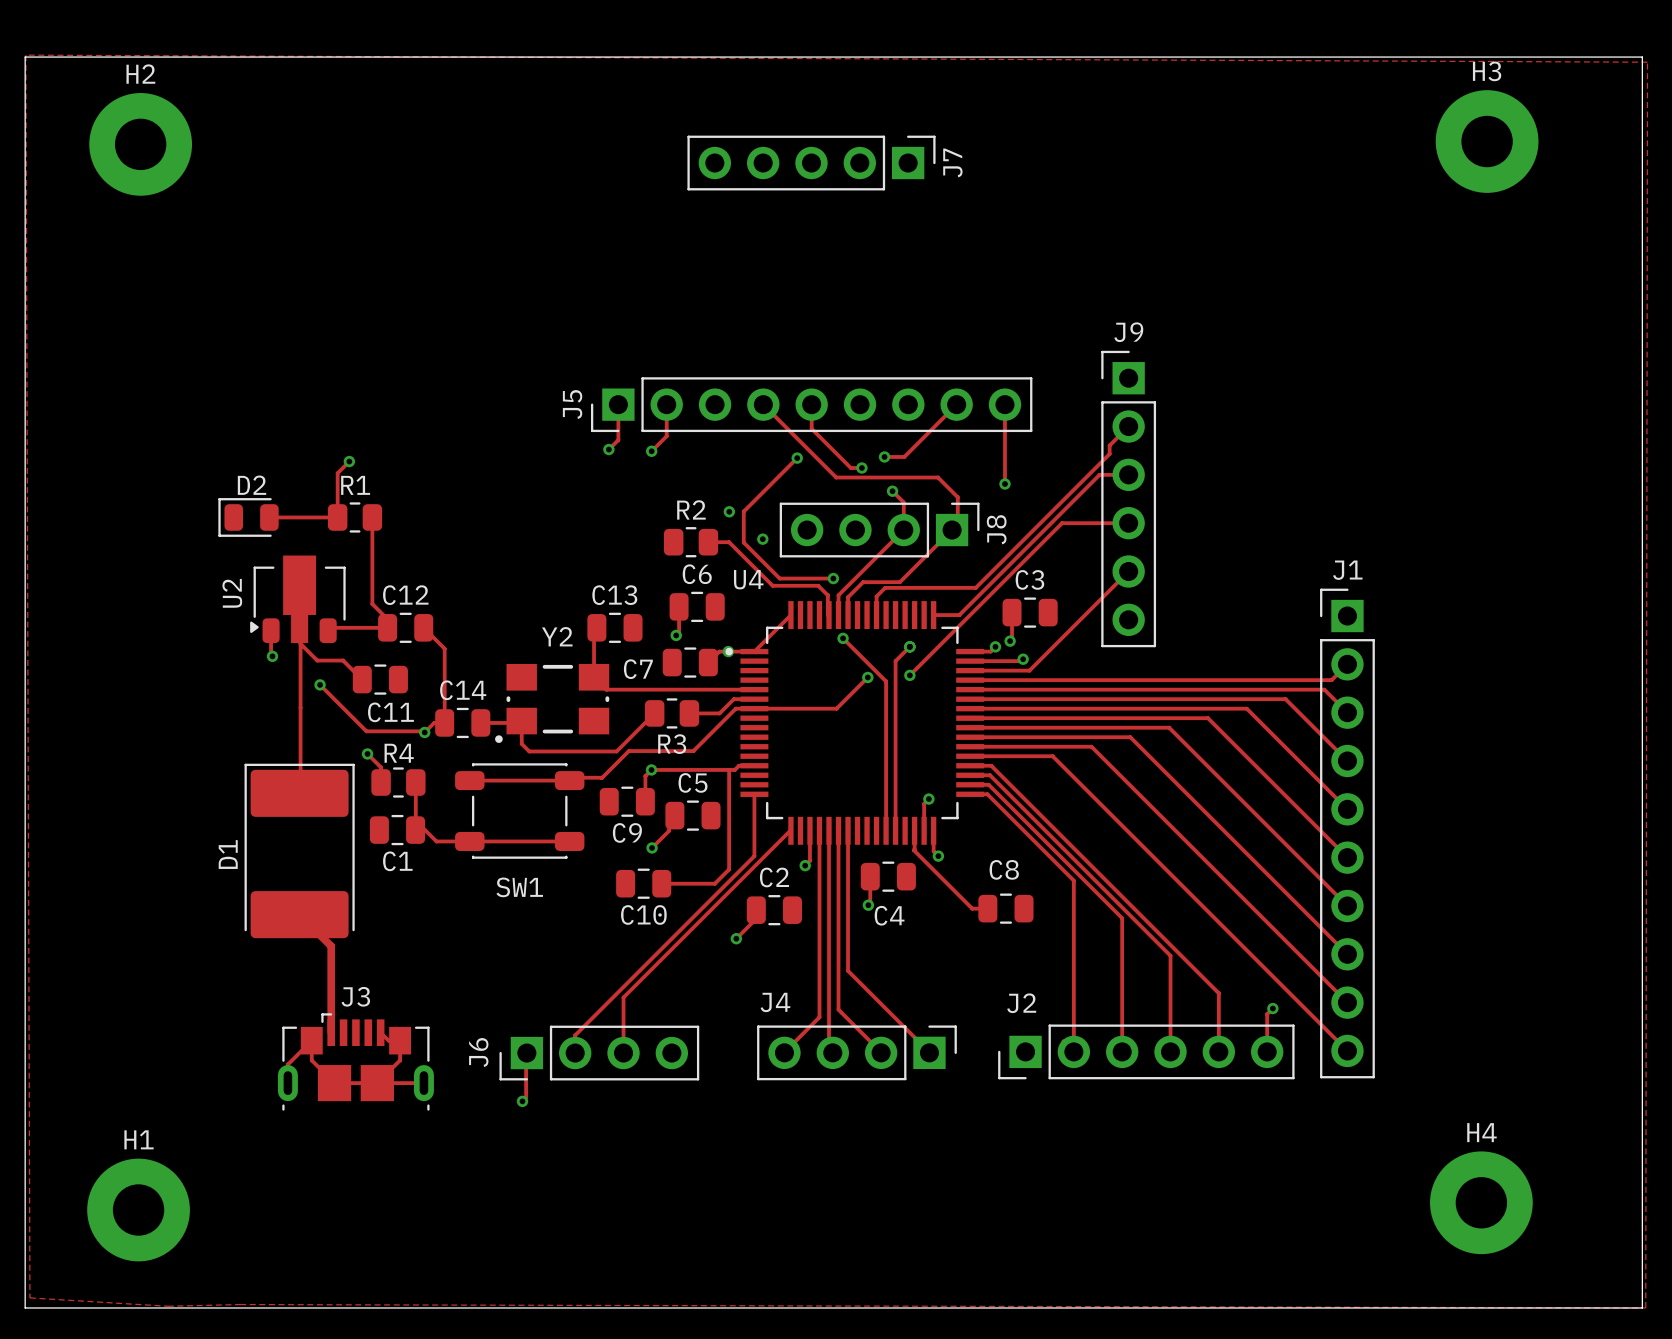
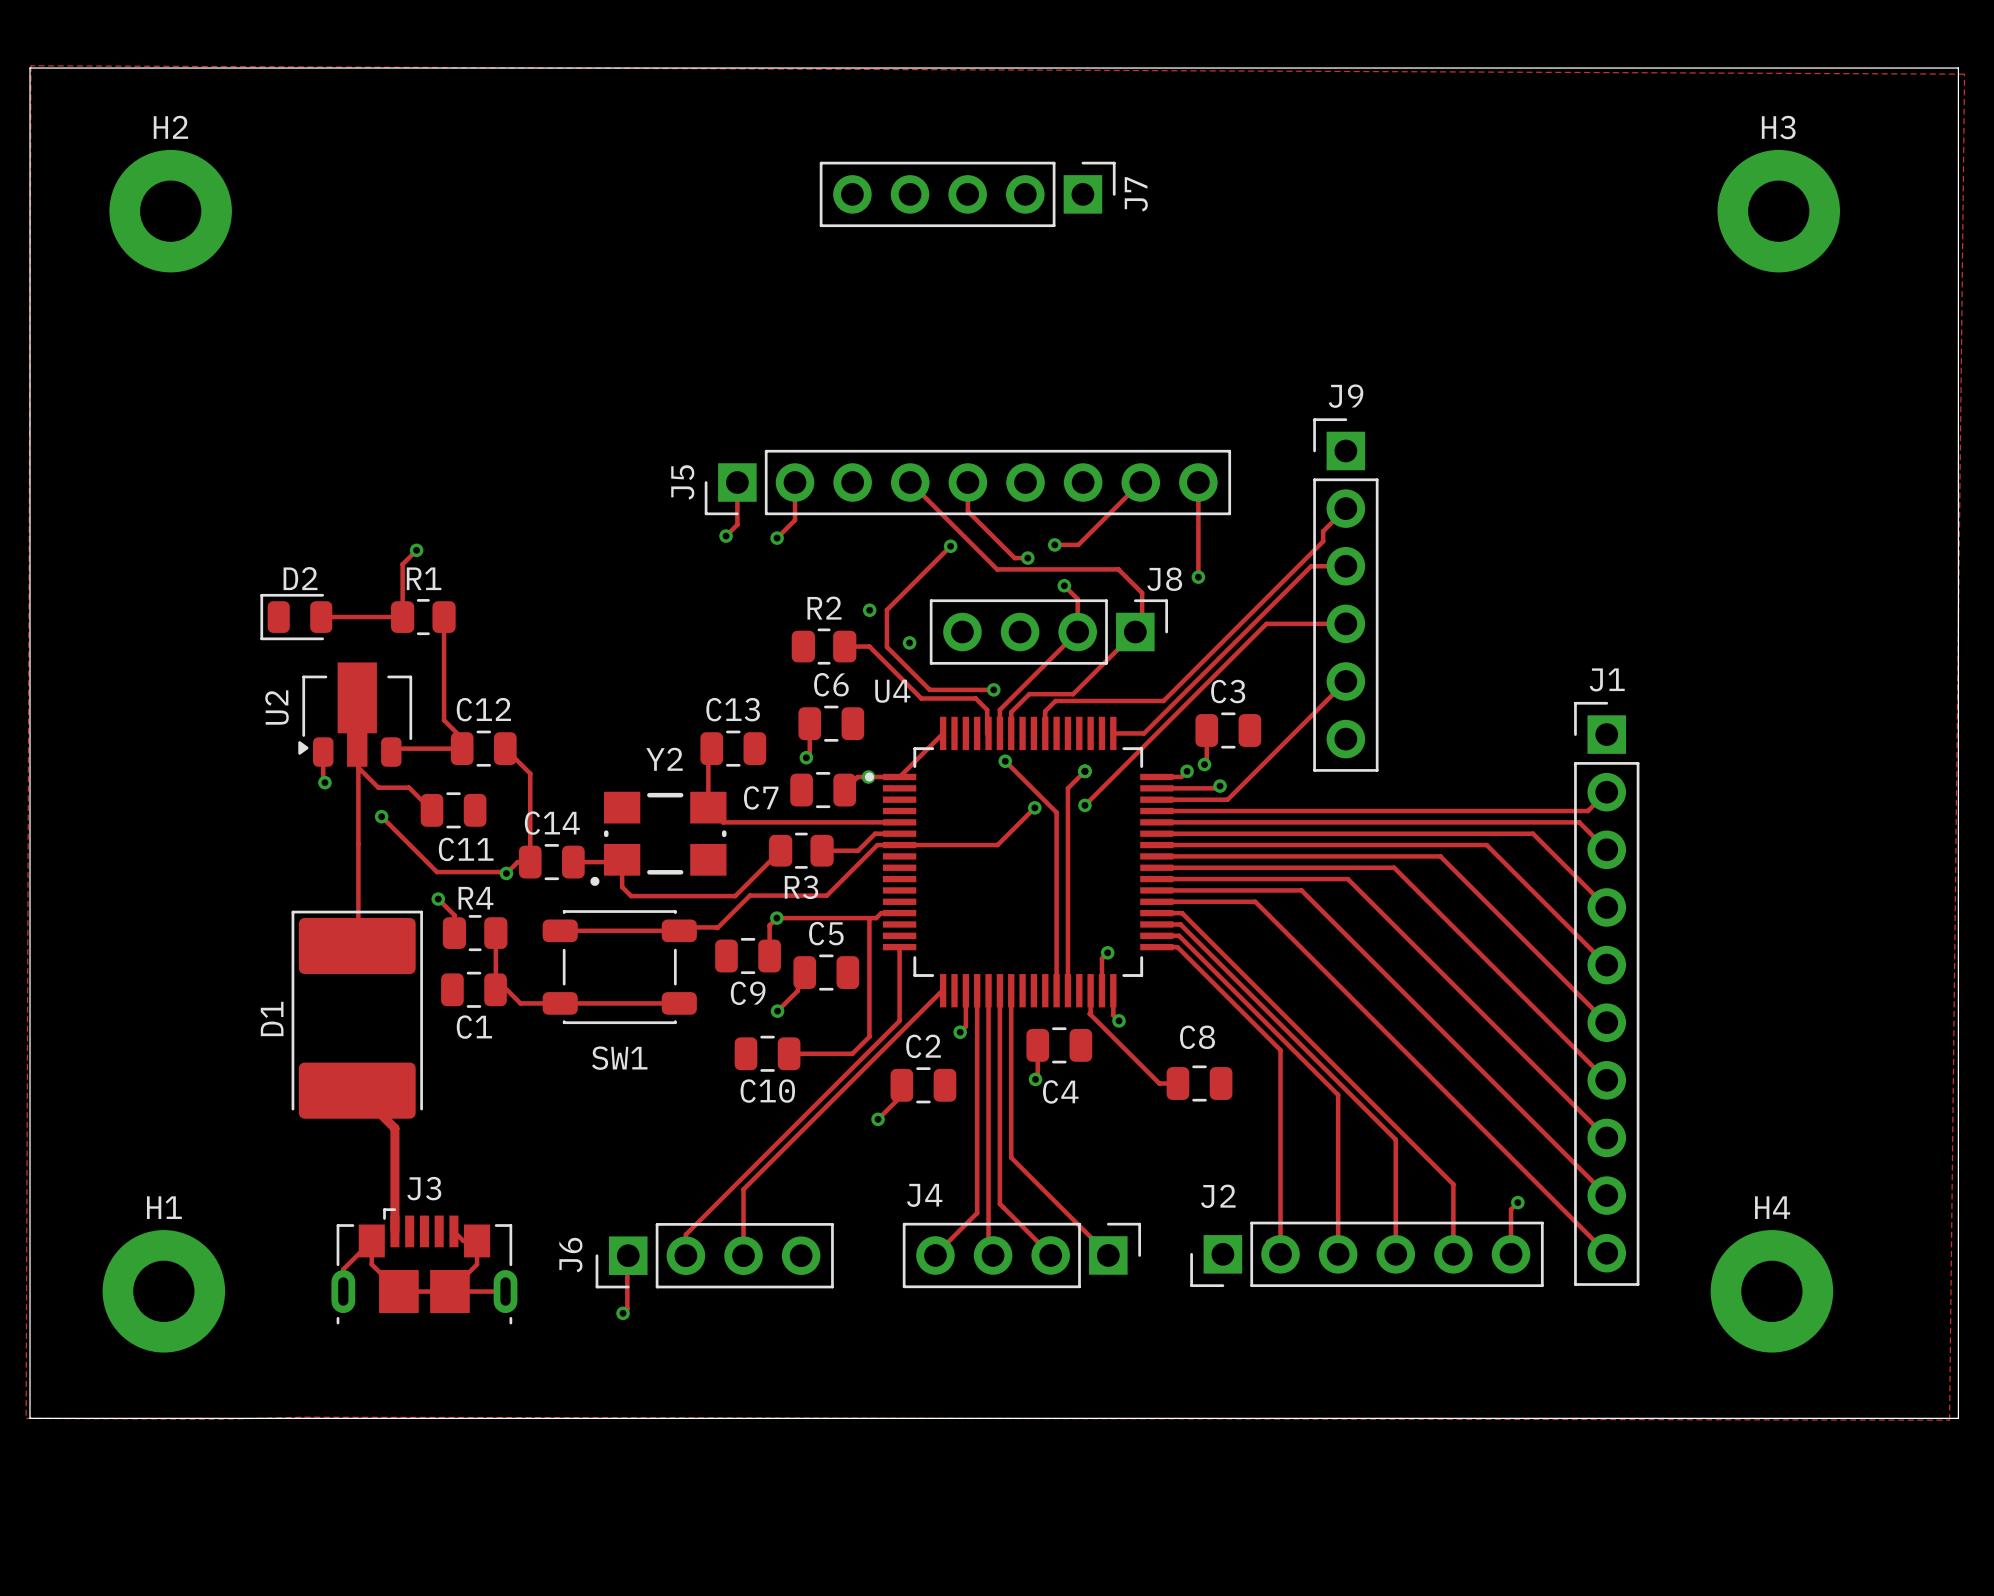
zone outline: (25, 55) (29, 1297) (167, 1306) (240, 1304) (1645, 1307) (1647, 62) -> (30, 65) (26, 1418) (218, 1419) (304, 1417) (1949, 1420) (1964, 74)
H3 position: (1487, 141) -> (1778, 211)
H2 position: (140, 144) -> (170, 211)
J8 name rotation: 0° (996, 529) -> 90° clockwise (1164, 579)
J8 name position: J8 (996, 529) -> J8 (1164, 579)
board edge: (25, 1189) (25, 1307) (1642, 1307) (1642, 1189) -> (30, 1418) (1958, 1418)
H4 position: (1481, 1202) -> (1771, 1291)
H1 position: (138, 1210) -> (163, 1291)

